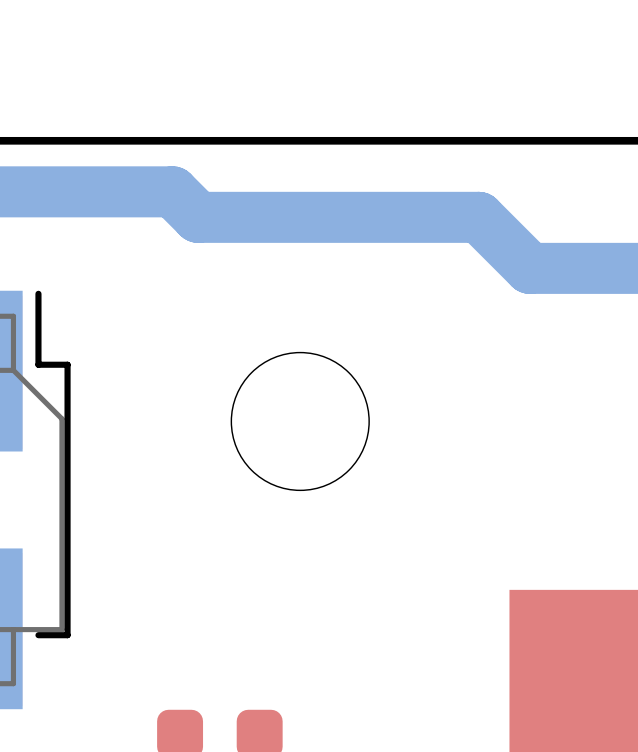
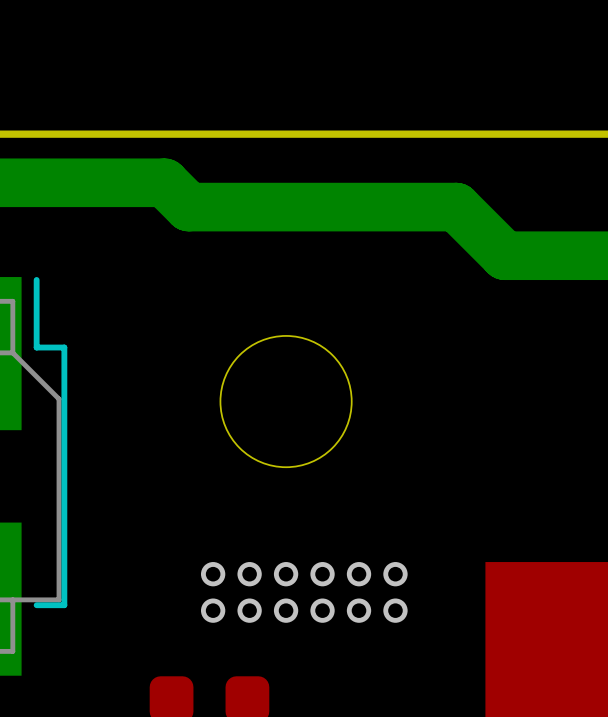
via: none -> (213, 574)
via: none -> (249, 574)
via: none -> (286, 574)
via: none -> (322, 574)
via: none -> (359, 574)
via: none -> (395, 574)
via: none -> (213, 610)
via: none -> (249, 610)
via: none -> (286, 610)
via: none -> (322, 610)
via: none -> (359, 610)
via: none -> (395, 610)

